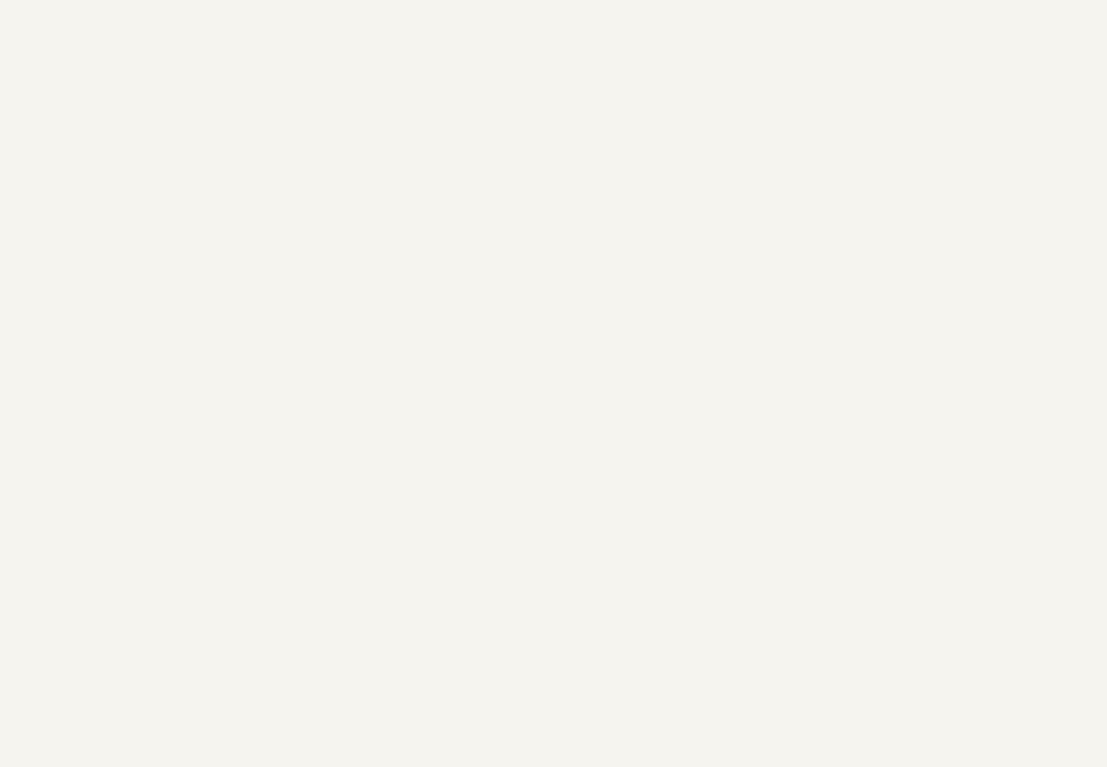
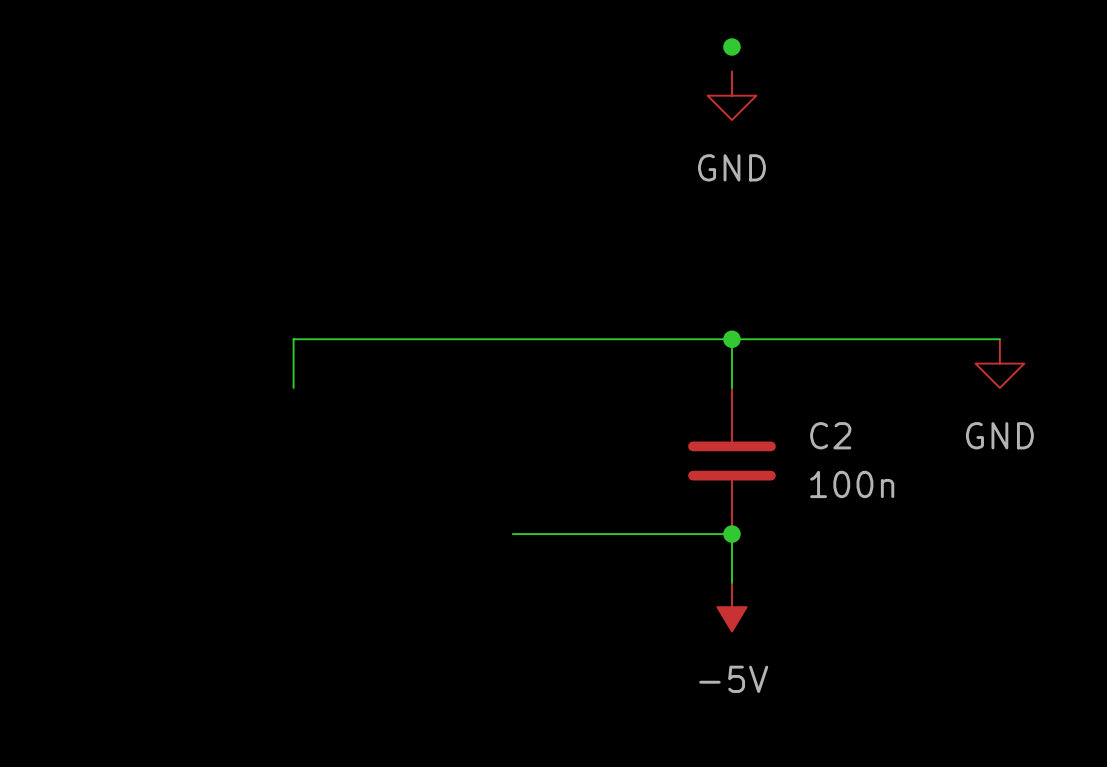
junction: none -> (731, 46)
power symbol: none -> GND (731, 95)
wire: none -> (731, 339) (731, 387)
junction: none -> (731, 339)
wire: none -> (999, 339) (293, 339) (293, 387)
power symbol: none -> GND (999, 363)
C2: none -> 100n (731, 461)
wire: none -> (512, 534) (731, 534) (731, 582)
junction: none -> (731, 534)
power symbol: none -> -5V (731, 607)

